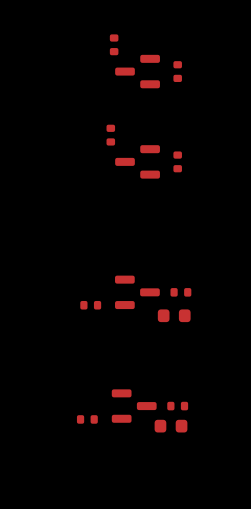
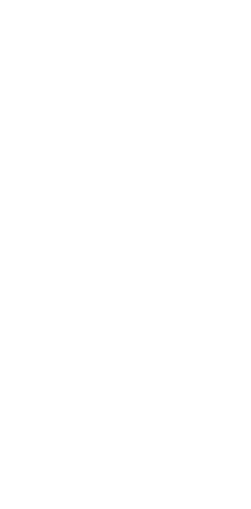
part: (114, 44) -> none
part: (137, 71) -> none
part: (177, 71) -> none
part: (110, 135) -> none
part: (137, 161) -> none
part: (177, 161) -> none
part: (137, 292) -> none
part: (180, 292) -> none
part: (90, 305) -> none
part: (174, 315) -> none
part: (134, 406) -> none
part: (177, 406) -> none
part: (87, 419) -> none
part: (171, 426) -> none

